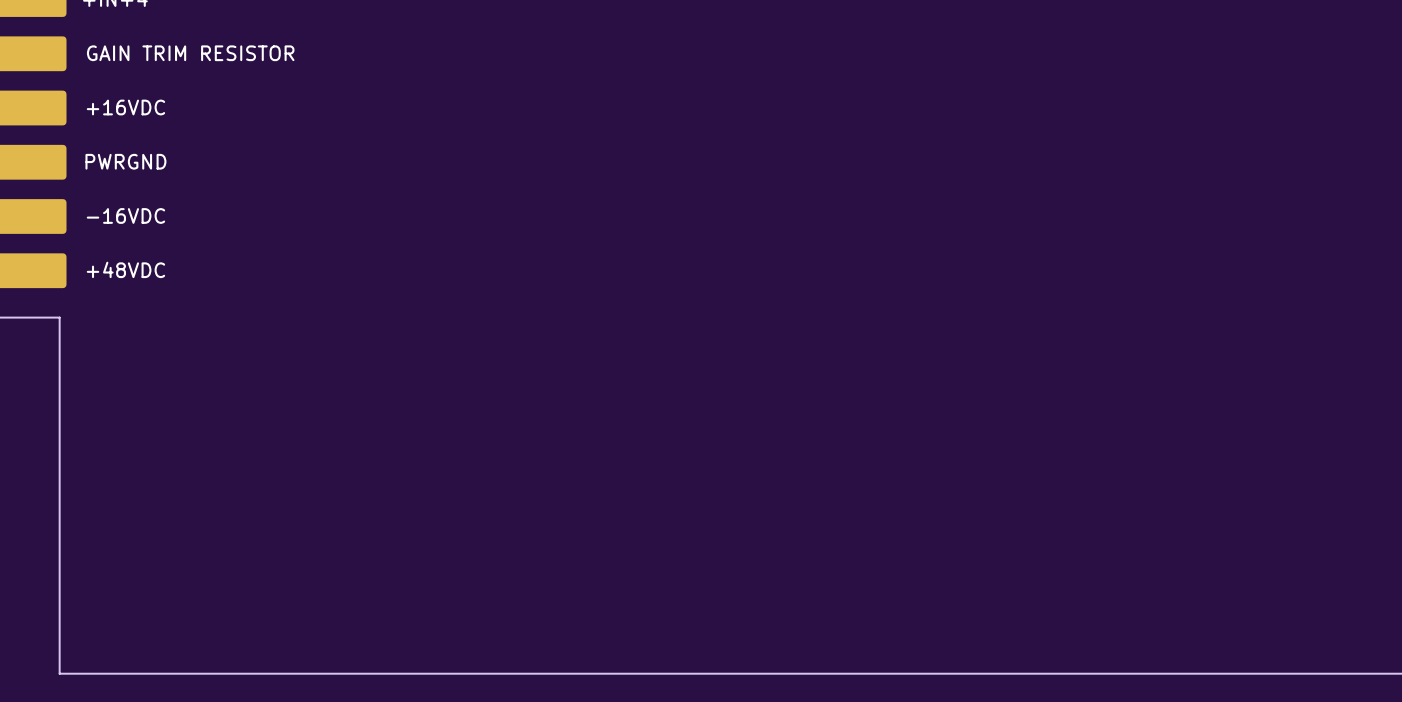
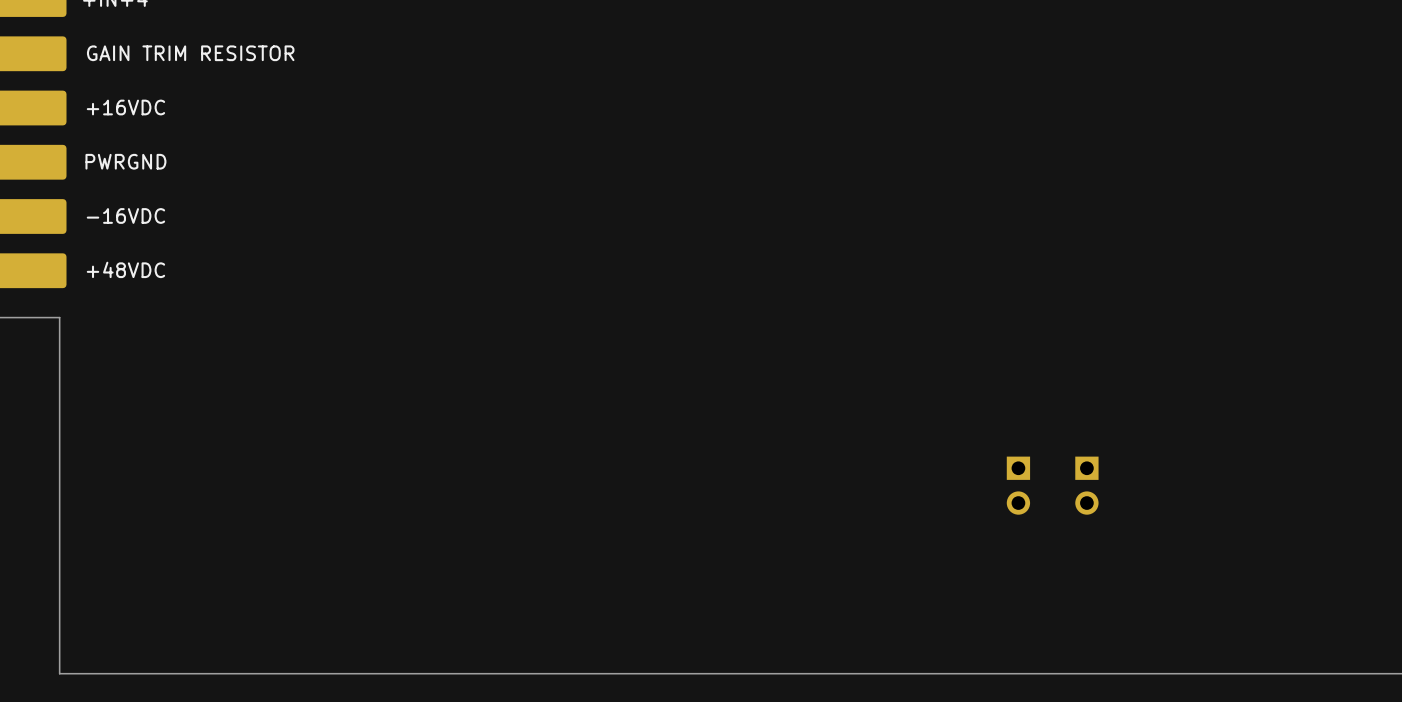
part: none -> (1018, 485)
part: none -> (1086, 485)

